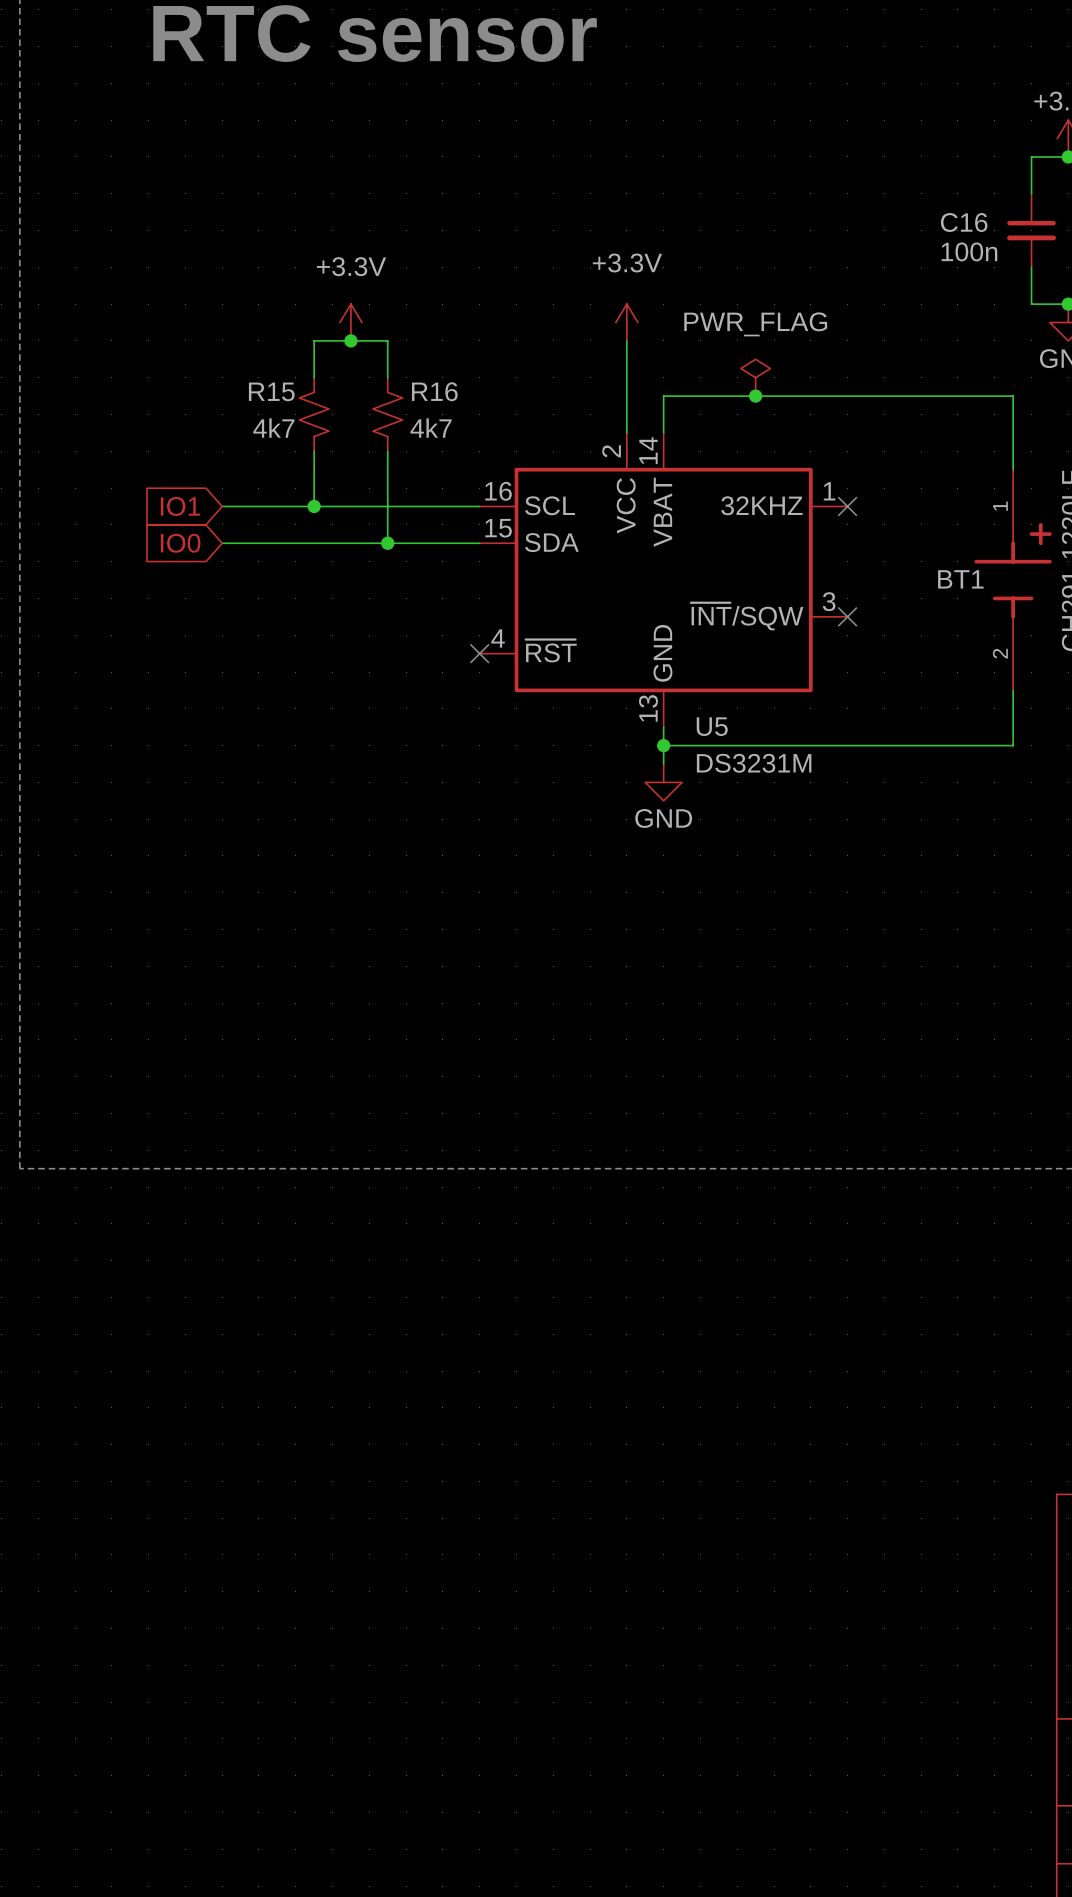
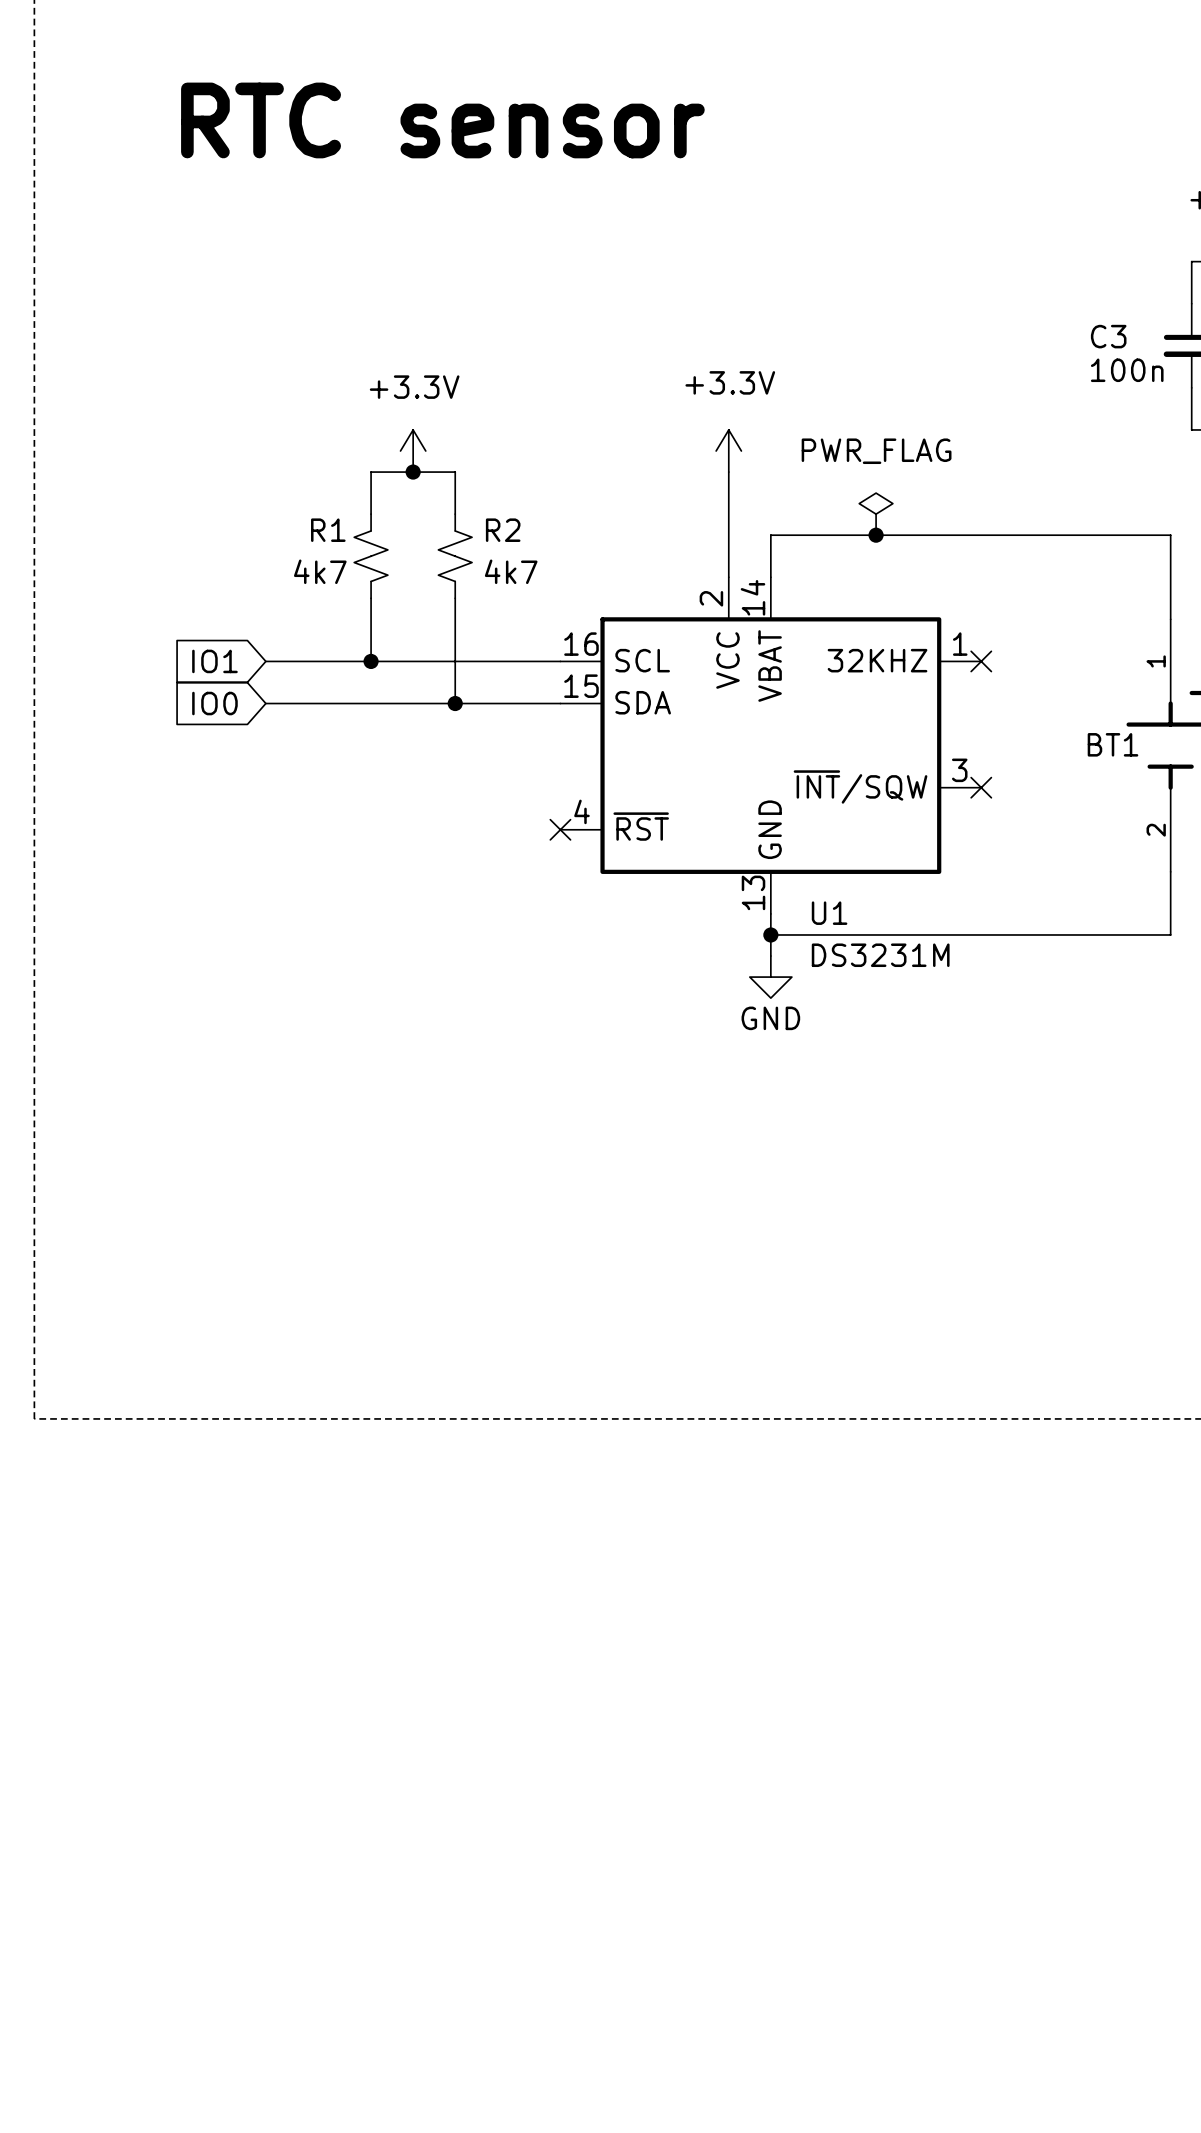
C16 name: C16 (964, 222) -> C3 (1108, 336)
R15 name: R15 (271, 391) -> R1 (328, 530)
R16 name: R16 (434, 391) -> R2 (503, 530)
U5 name: U5 (712, 726) -> U1 (829, 913)

